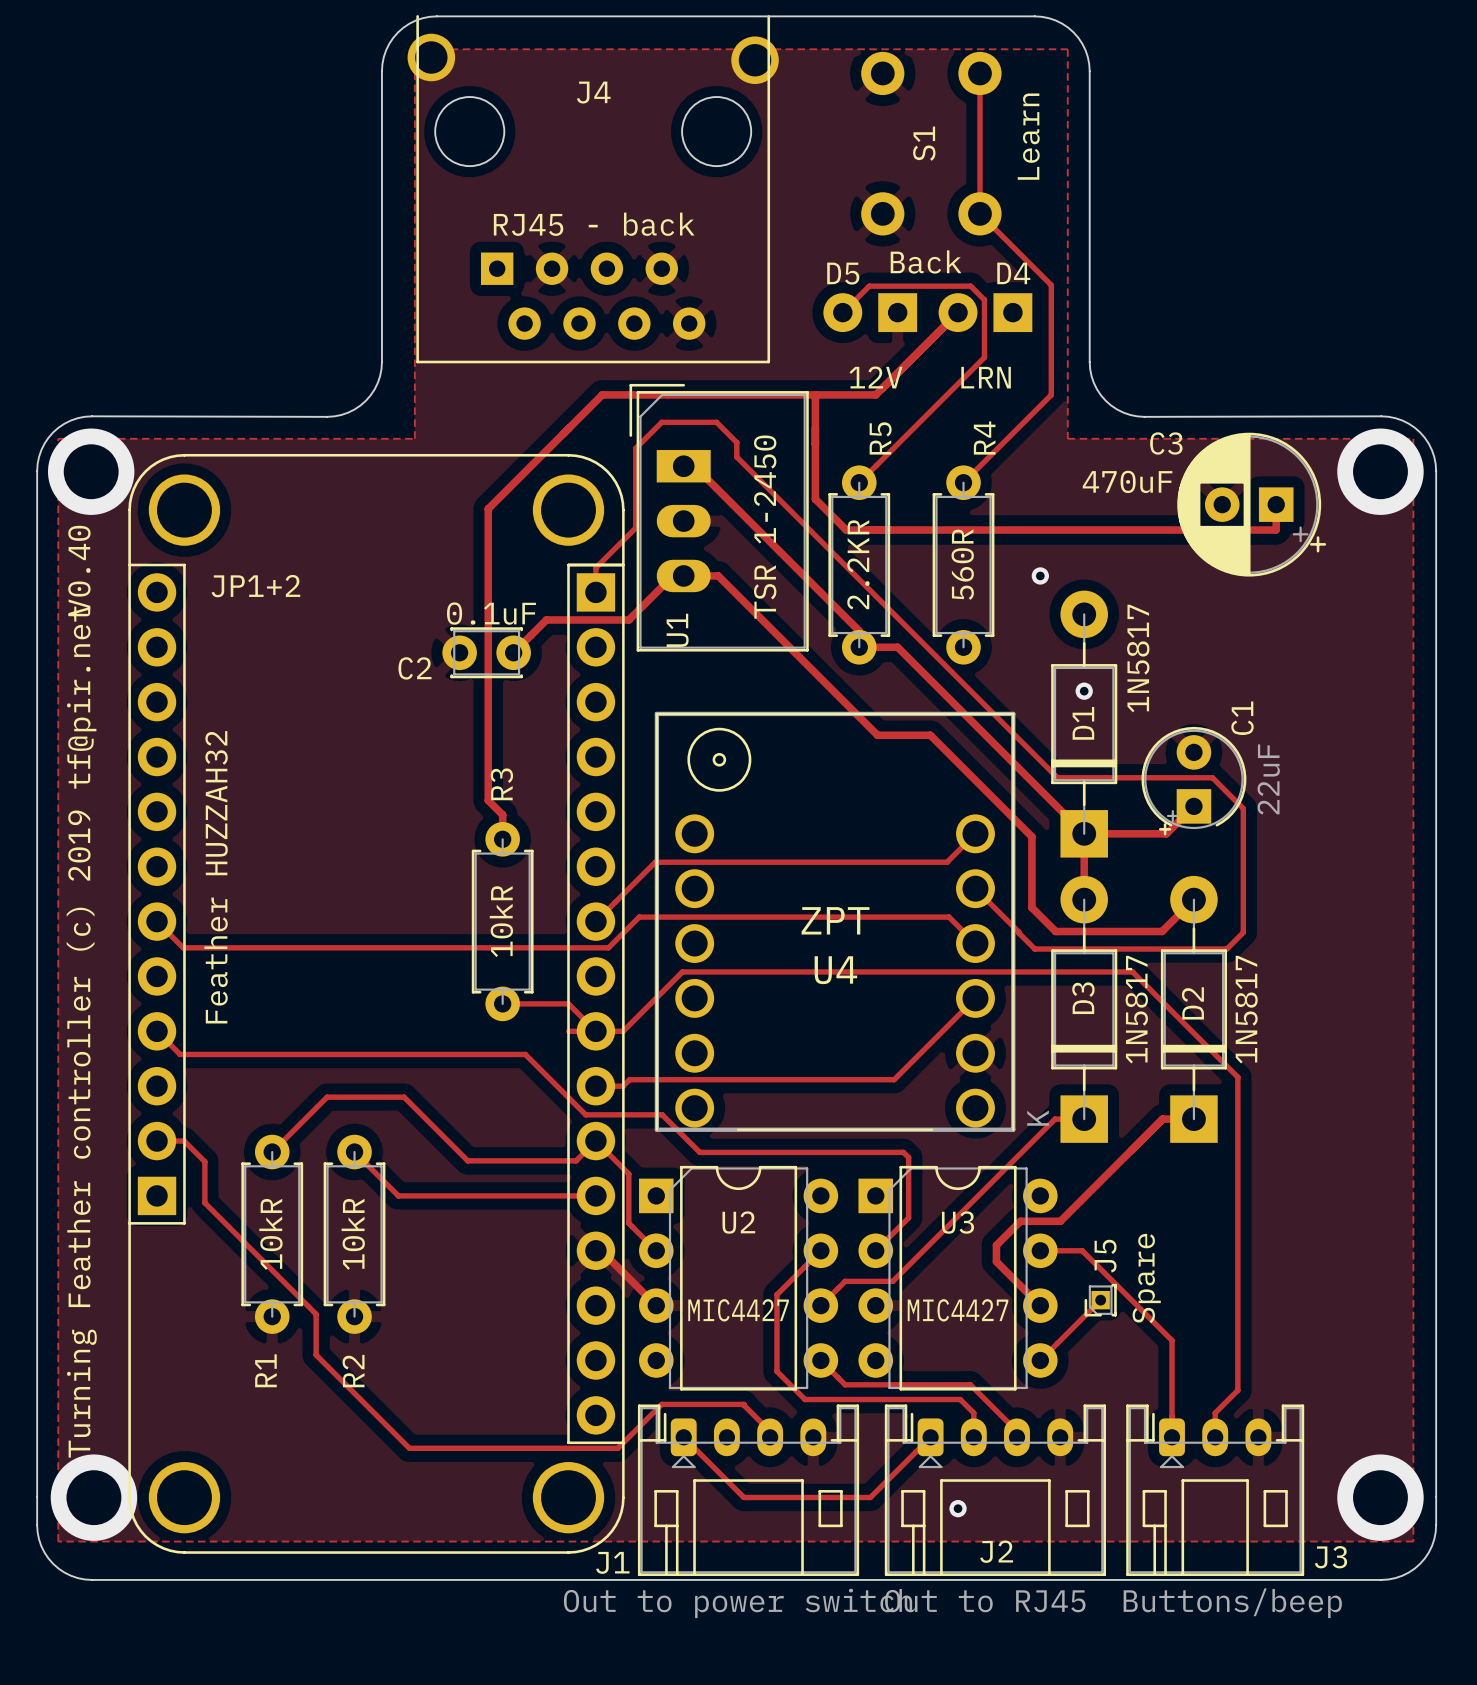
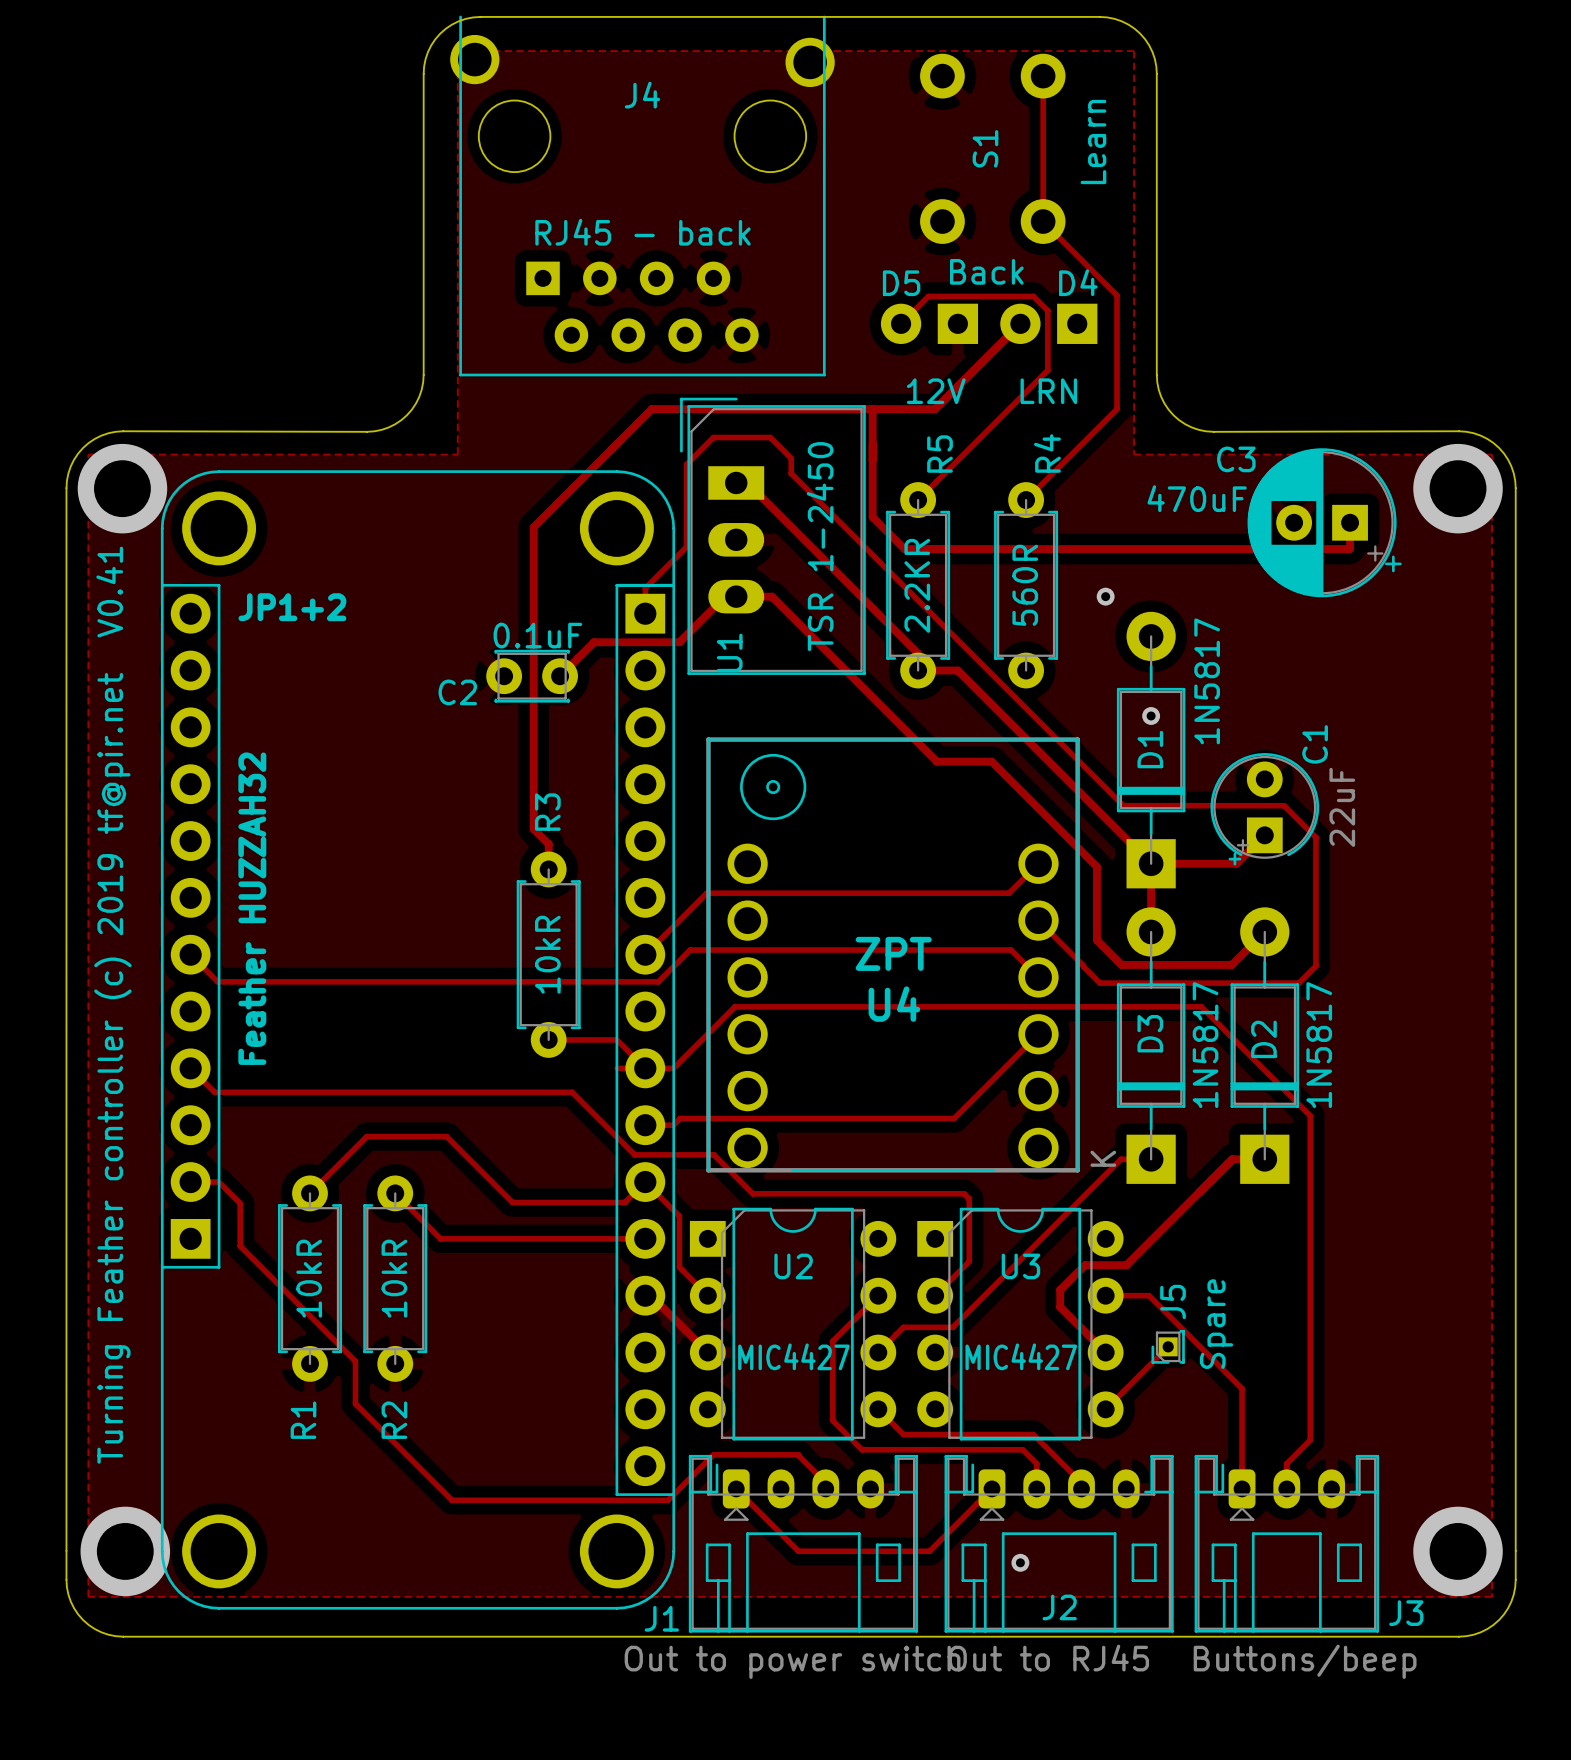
text: V0.40 (79, 570) -> V0.41 (109, 592)

